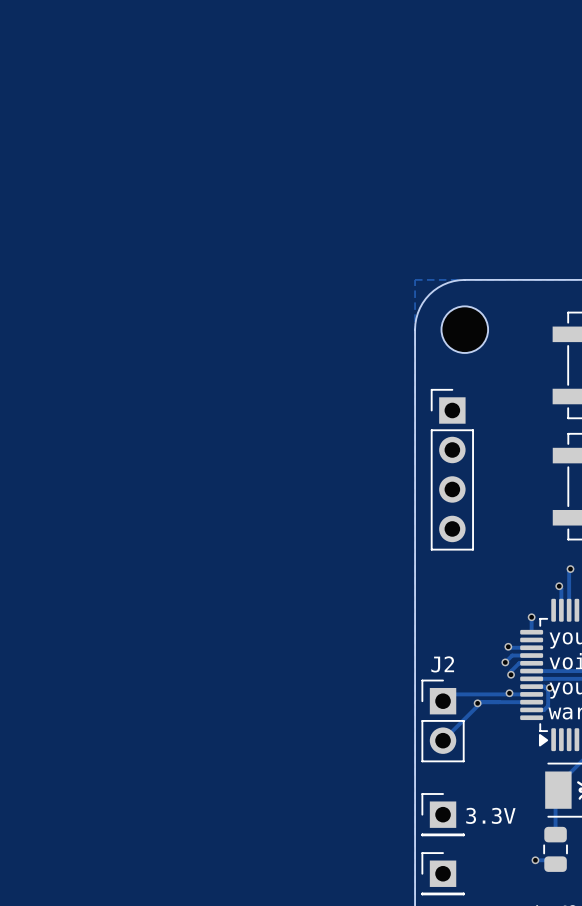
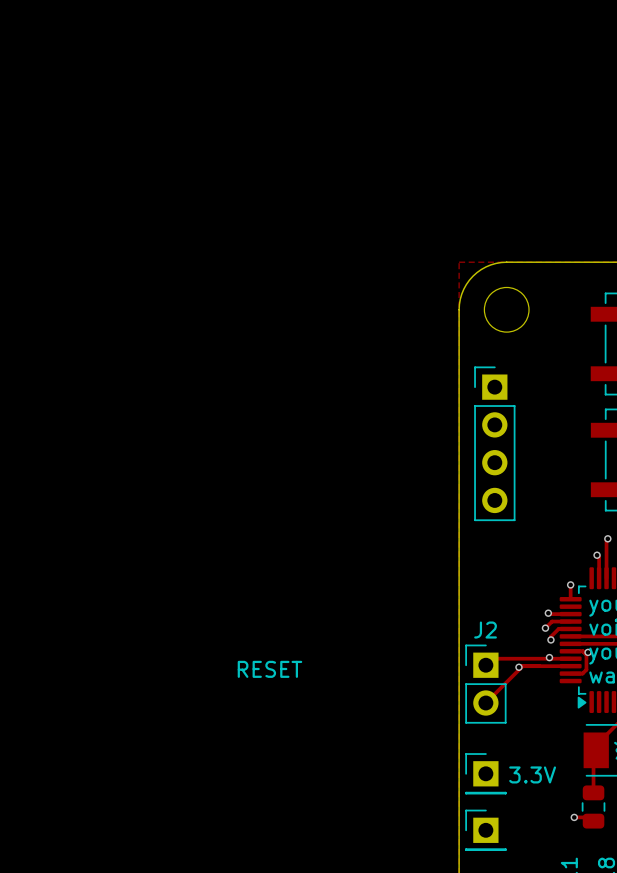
text: none -> RESET (269, 669)

